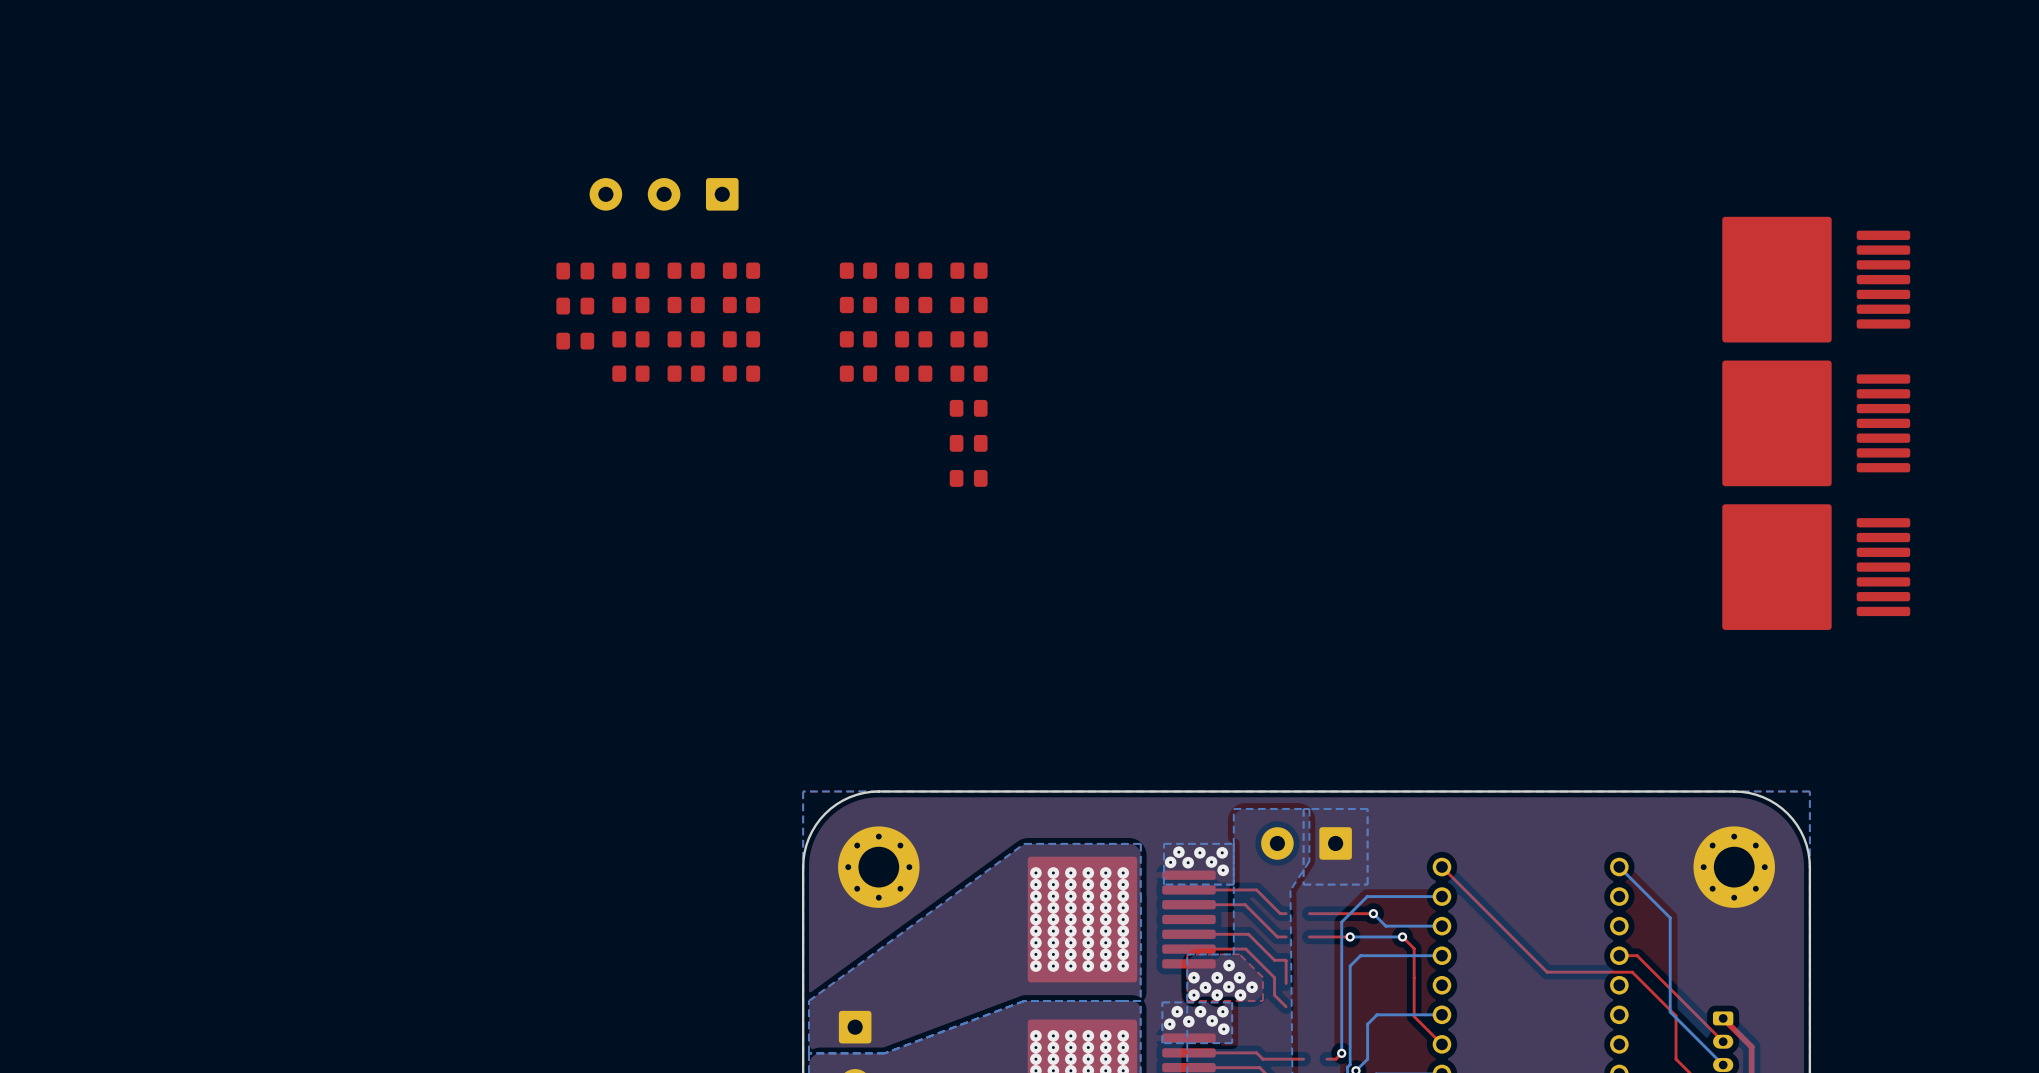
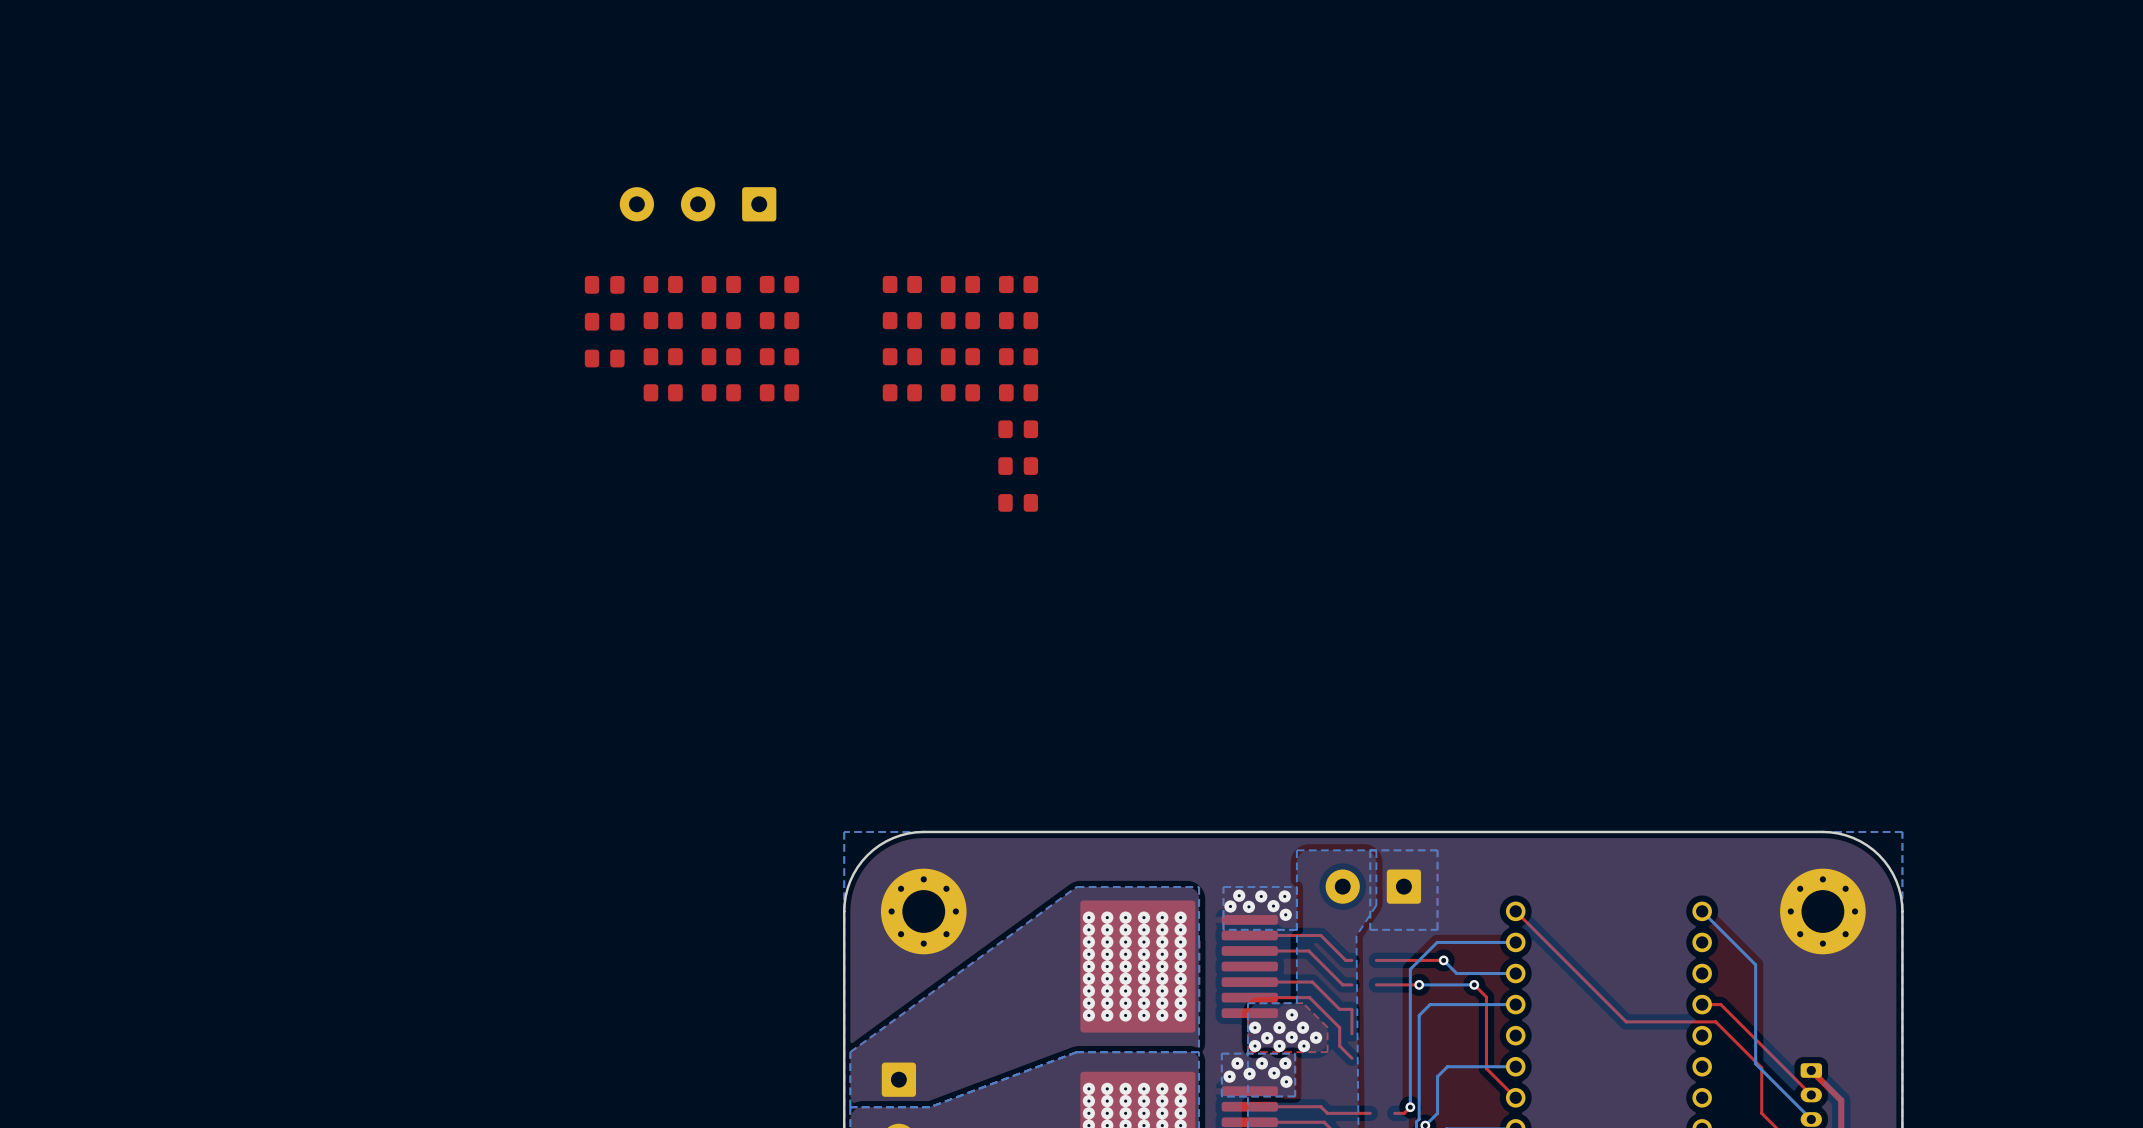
part: (1816, 279) -> none
part: (1816, 423) -> none
part: (1816, 567) -> none

